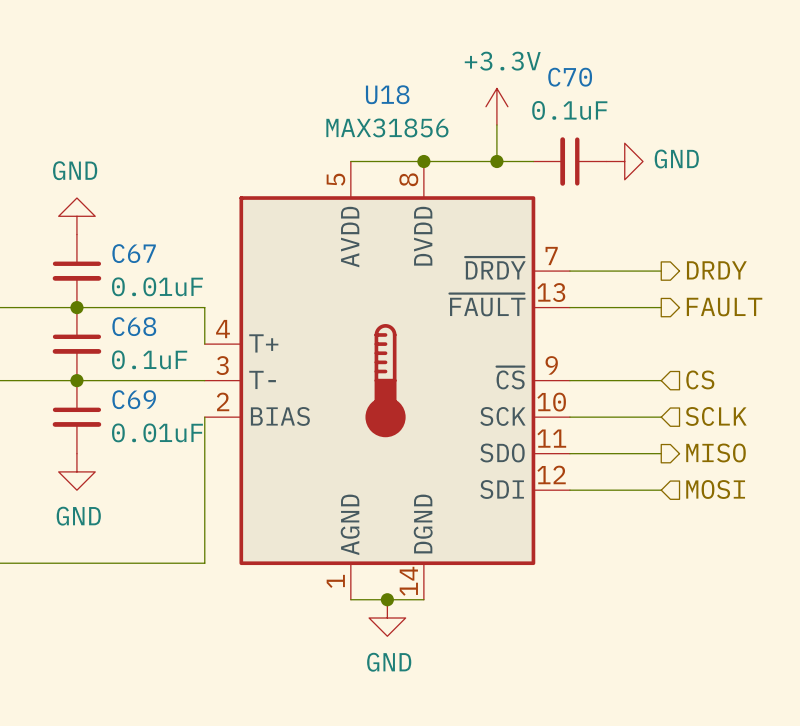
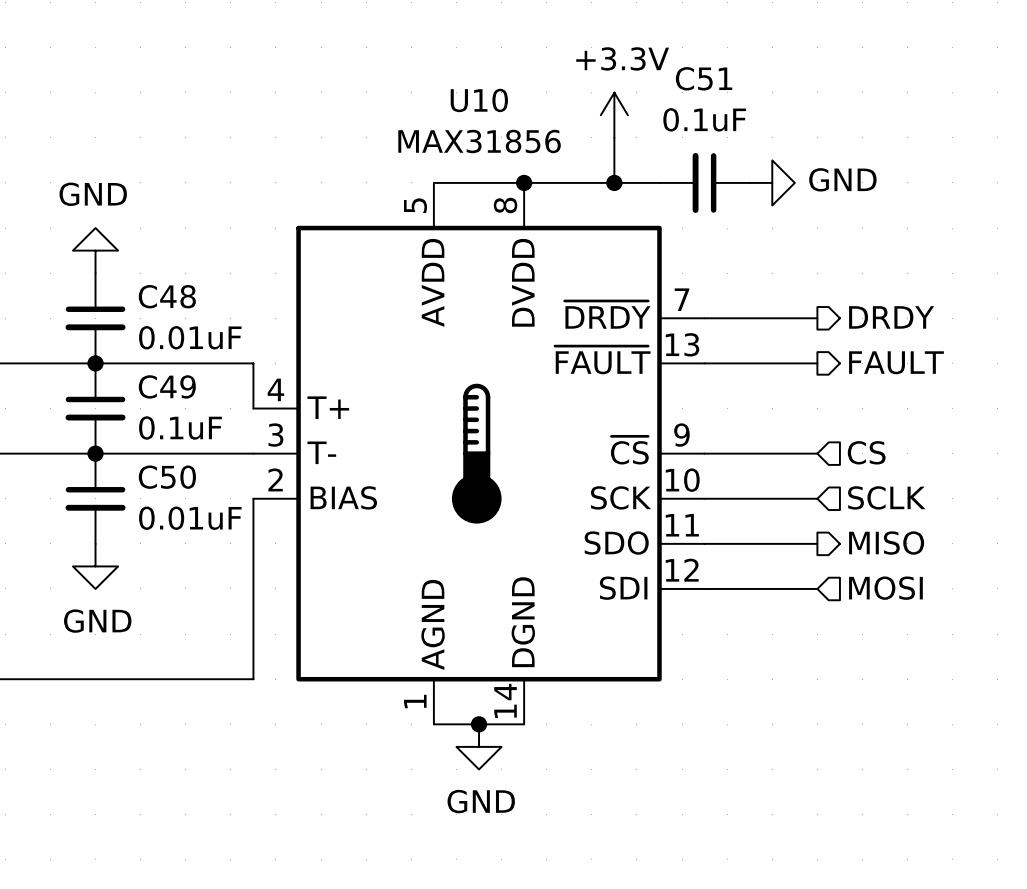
C70 name: C70 (570, 77) -> C51 (704, 78)
U18 name: U18 (387, 94) -> U10 (479, 100)
C67 name: C67 (134, 253) -> C48 (167, 296)
C68 name: C68 (134, 326) -> C49 (167, 386)
C69 name: C69 (134, 399) -> C50 (167, 477)

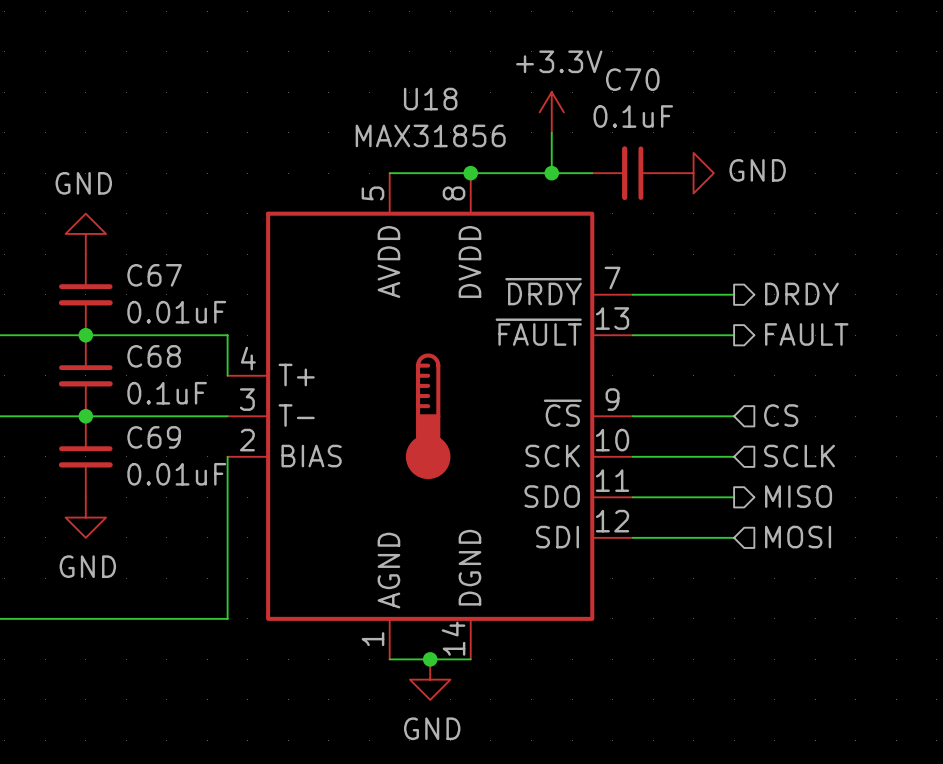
C51 name: C51 (704, 78) -> C70 (632, 79)
U10 name: U10 (479, 100) -> U18 (430, 99)
C48 name: C48 (167, 296) -> C67 (154, 275)
C49 name: C49 (167, 386) -> C68 (154, 356)
C50 name: C50 (167, 477) -> C69 (154, 437)

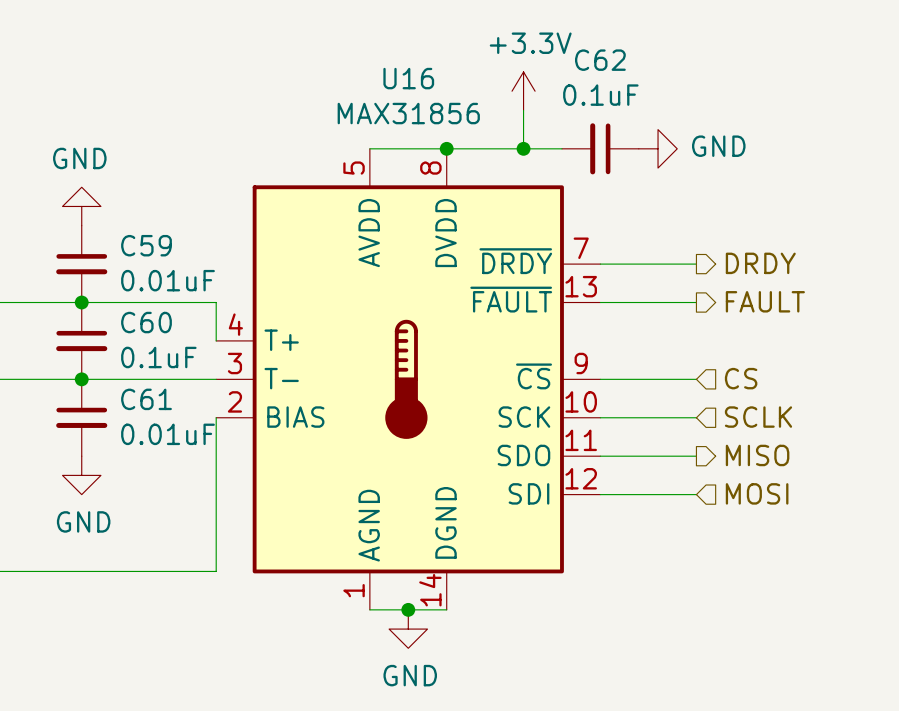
C70 name: C70 (632, 79) -> C62 (600, 60)
U18 name: U18 (430, 99) -> U16 (408, 78)
C67 name: C67 (154, 275) -> C59 (146, 245)
C68 name: C68 (154, 356) -> C60 (146, 322)
C69 name: C69 (154, 437) -> C61 (146, 399)

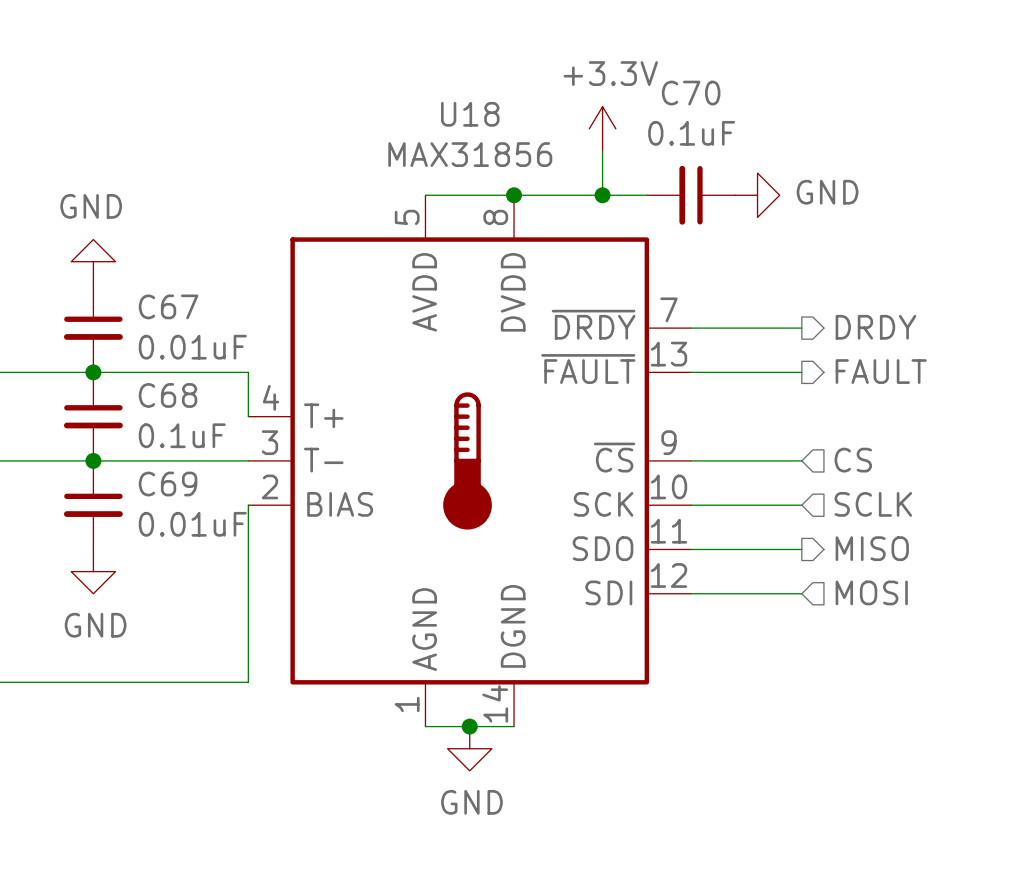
C62 name: C62 (600, 60) -> C70 (691, 93)
U16 name: U16 (408, 78) -> U18 (470, 114)
C59 name: C59 (146, 245) -> C67 (168, 306)
C60 name: C60 (146, 322) -> C68 (168, 395)
C61 name: C61 (146, 399) -> C69 (168, 484)

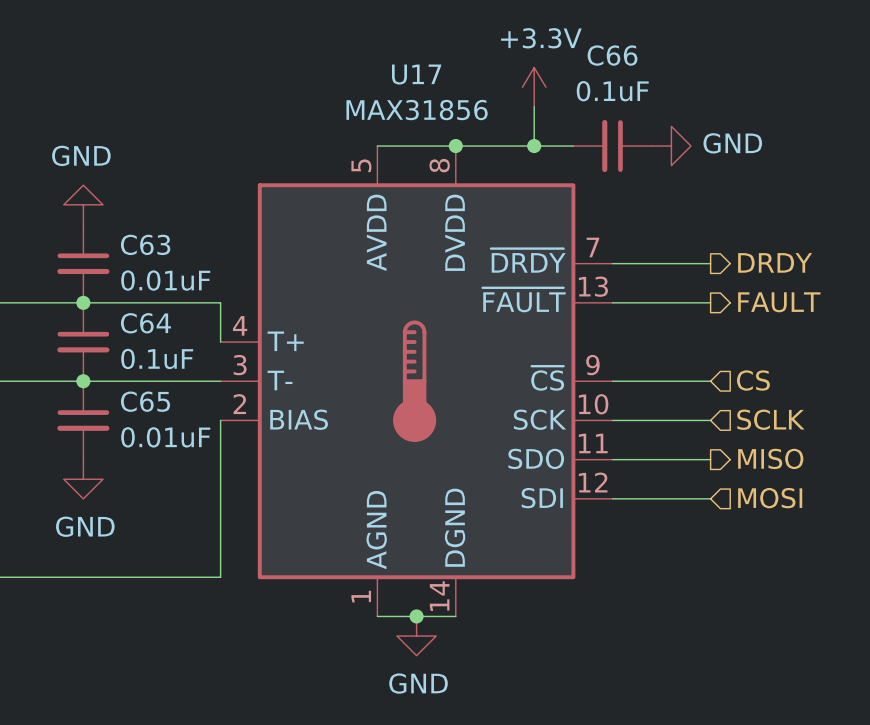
C70 name: C70 (691, 93) -> C66 (612, 55)
U18 name: U18 (470, 114) -> U17 (416, 74)
C67 name: C67 (168, 306) -> C63 (145, 244)
C68 name: C68 (168, 395) -> C64 (145, 323)
C69 name: C69 (168, 484) -> C65 (145, 401)

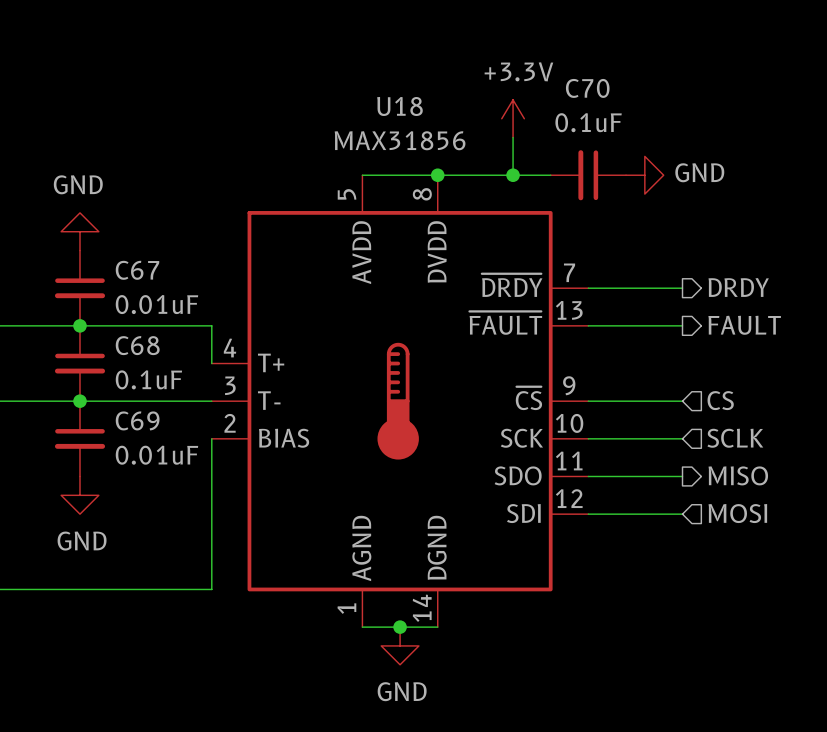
C66 name: C66 (612, 55) -> C70 (587, 88)
U17 name: U17 (416, 74) -> U18 (399, 106)
C63 name: C63 (145, 244) -> C67 (137, 270)
C64 name: C64 (145, 323) -> C68 (137, 345)
C65 name: C65 (145, 401) -> C69 (137, 420)

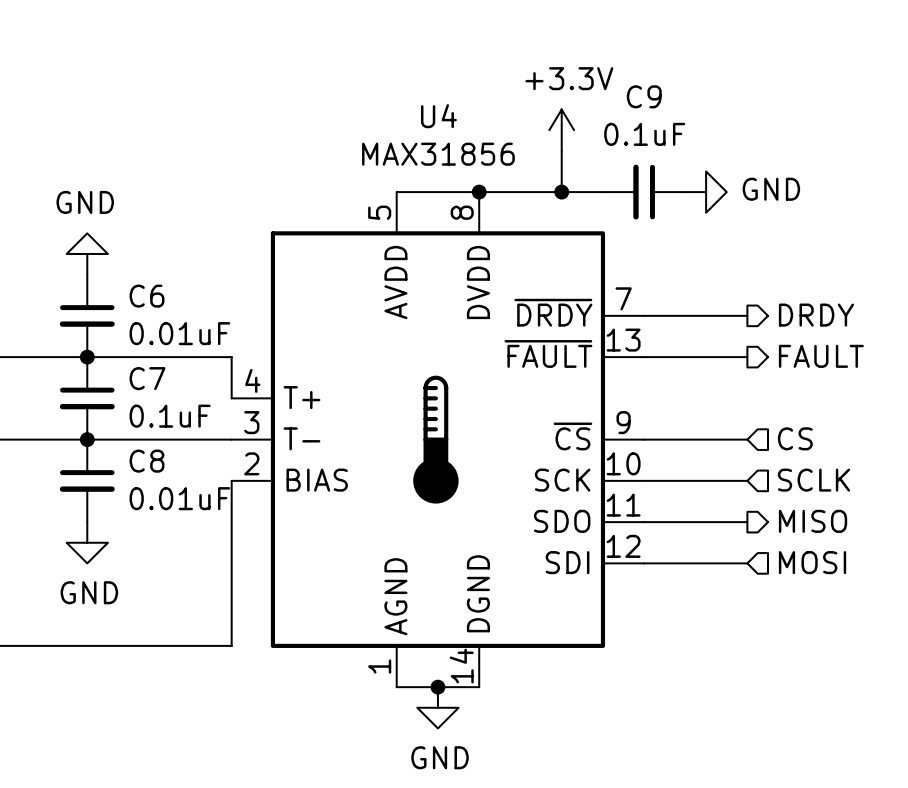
C70 name: C70 (587, 88) -> C9 (644, 96)
U18 name: U18 (399, 106) -> U4 (438, 116)
C67 name: C67 (137, 270) -> C6 (147, 296)
C68 name: C68 (137, 345) -> C7 (147, 378)
C69 name: C69 (137, 420) -> C8 (147, 461)

